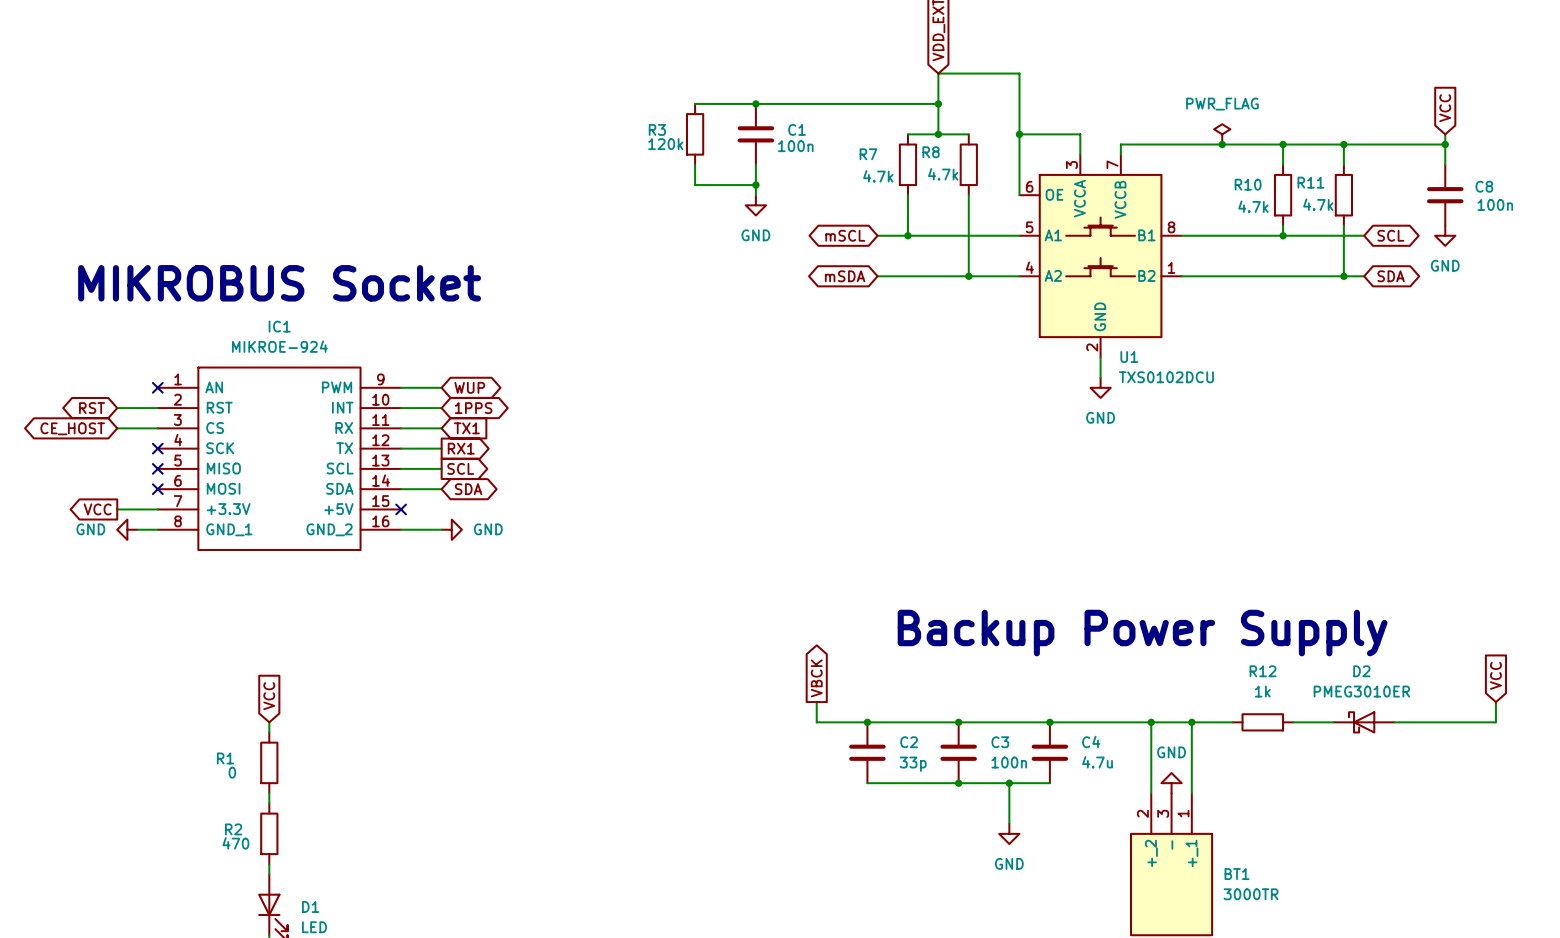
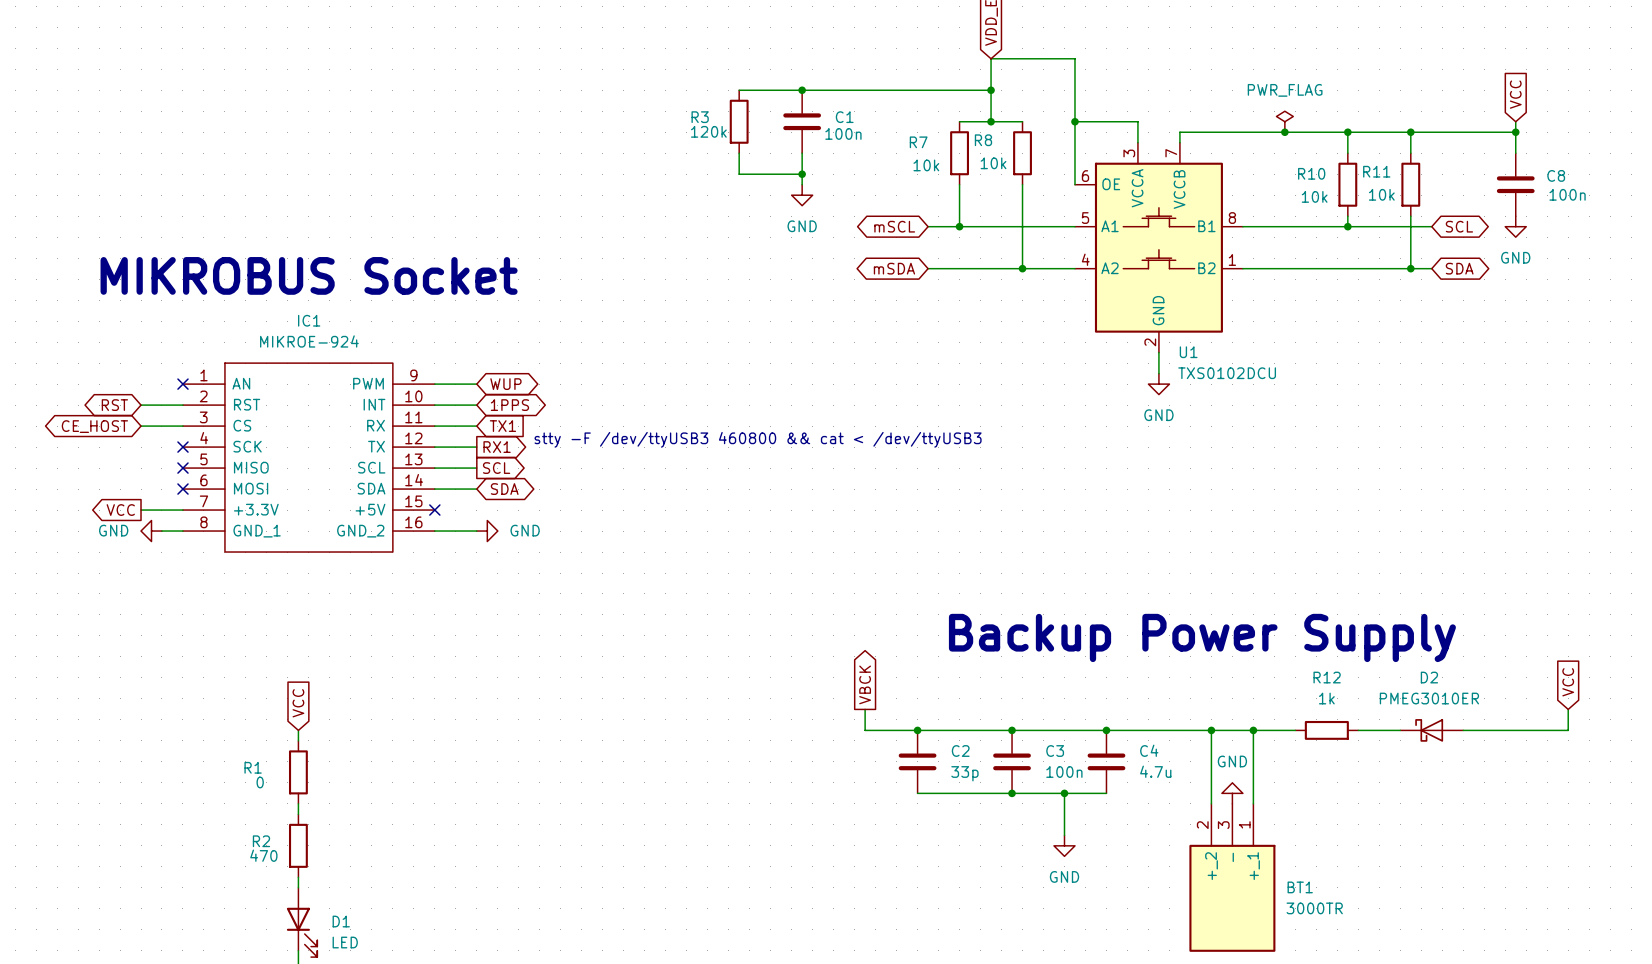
R8 value: 4.7k (943, 174) -> 10k (993, 163)
R7 value: 4.7k (878, 176) -> 10k (926, 165)
R11 value: 4.7k (1318, 204) -> 10k (1381, 194)
R10 value: 4.7k (1253, 206) -> 10k (1314, 196)
text: none -> stty -F /dev/ttyUSB3 460800 && cat < /dev/ttyUSB3 (758, 439)

